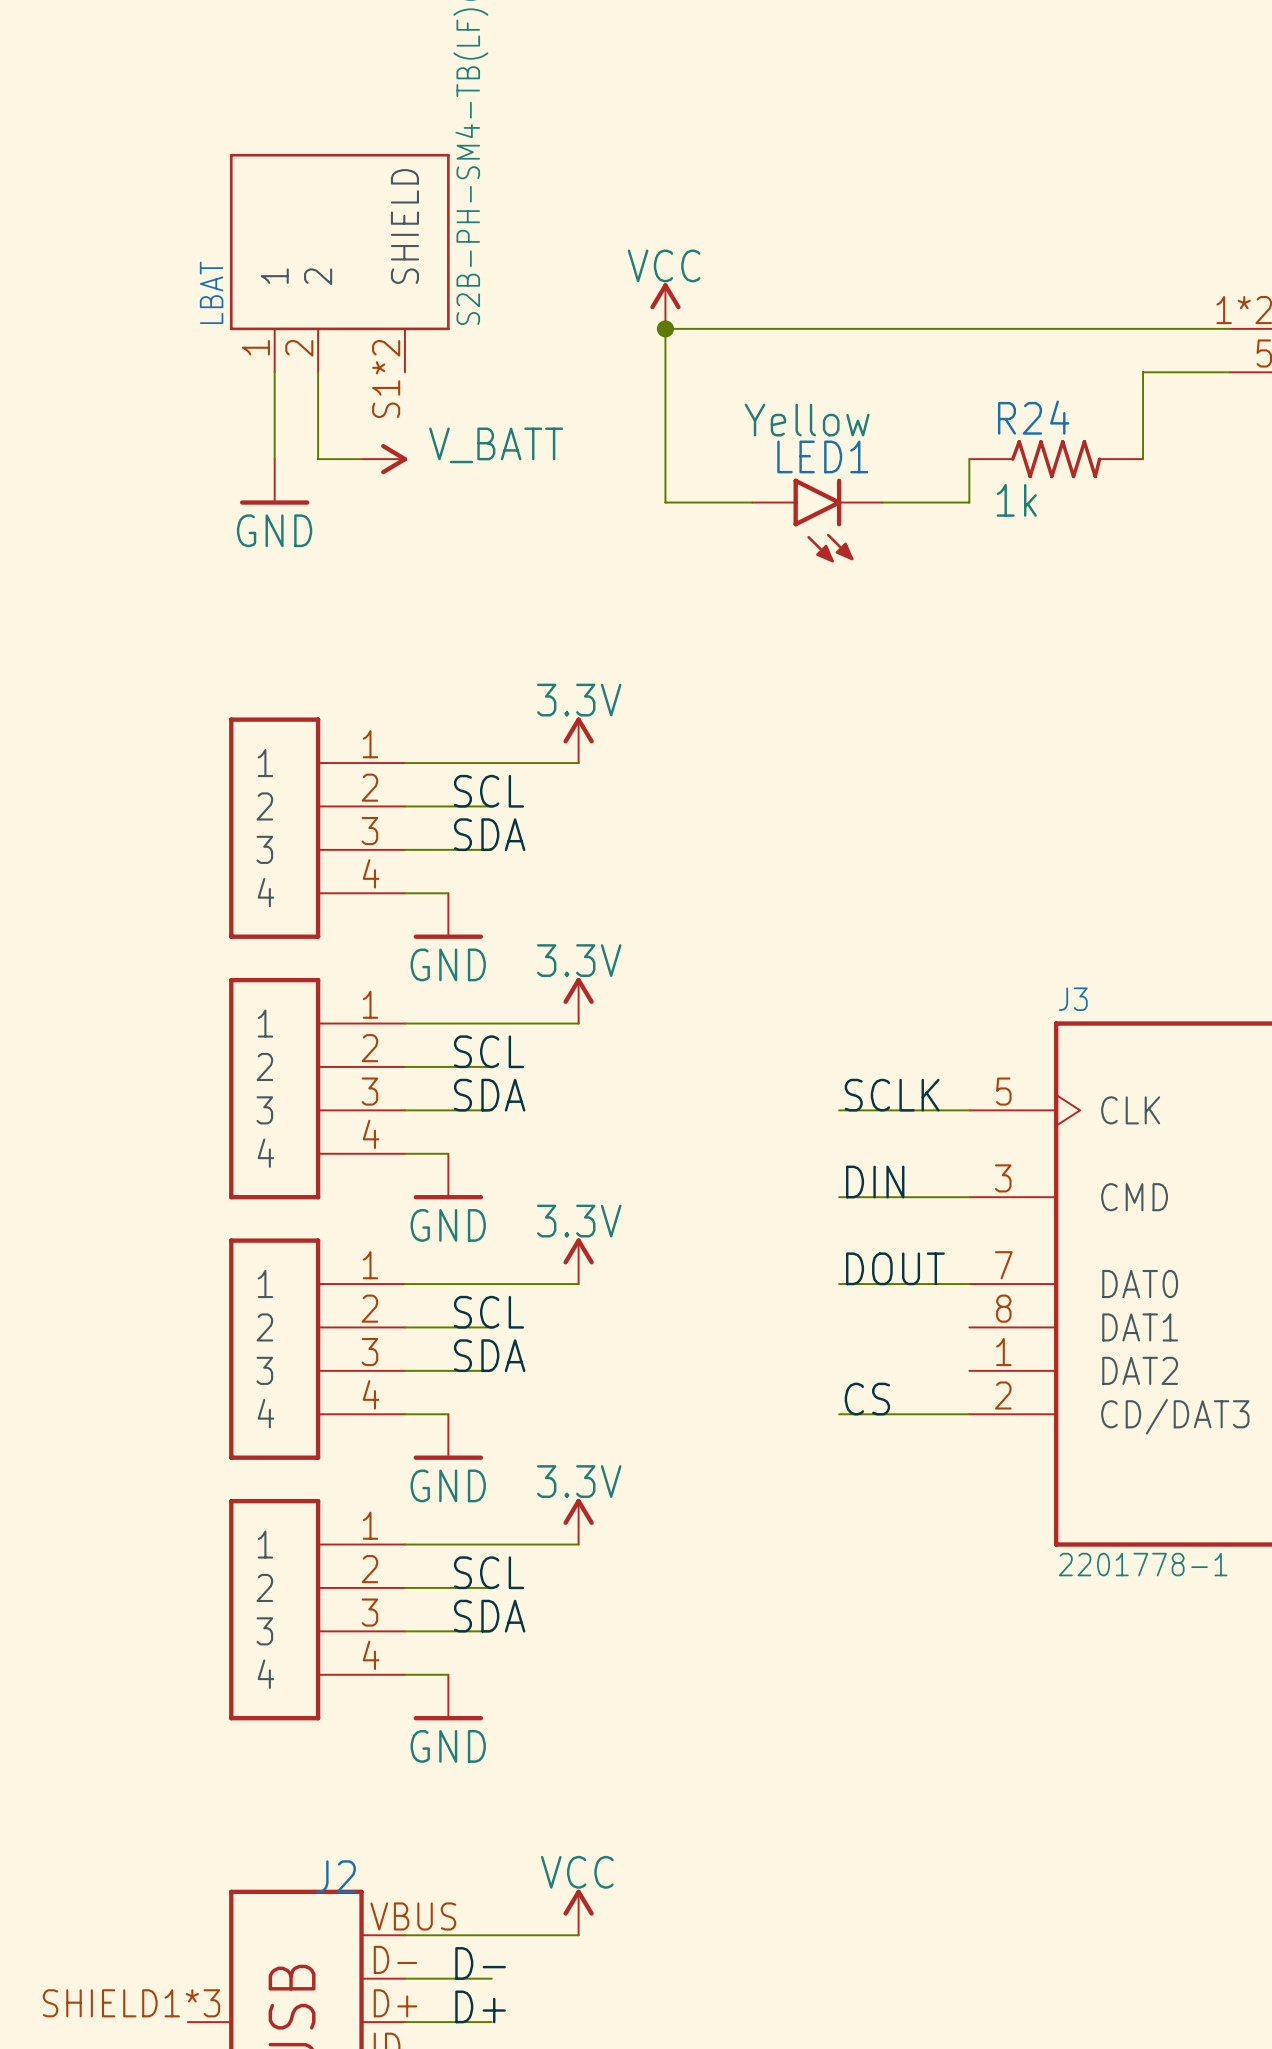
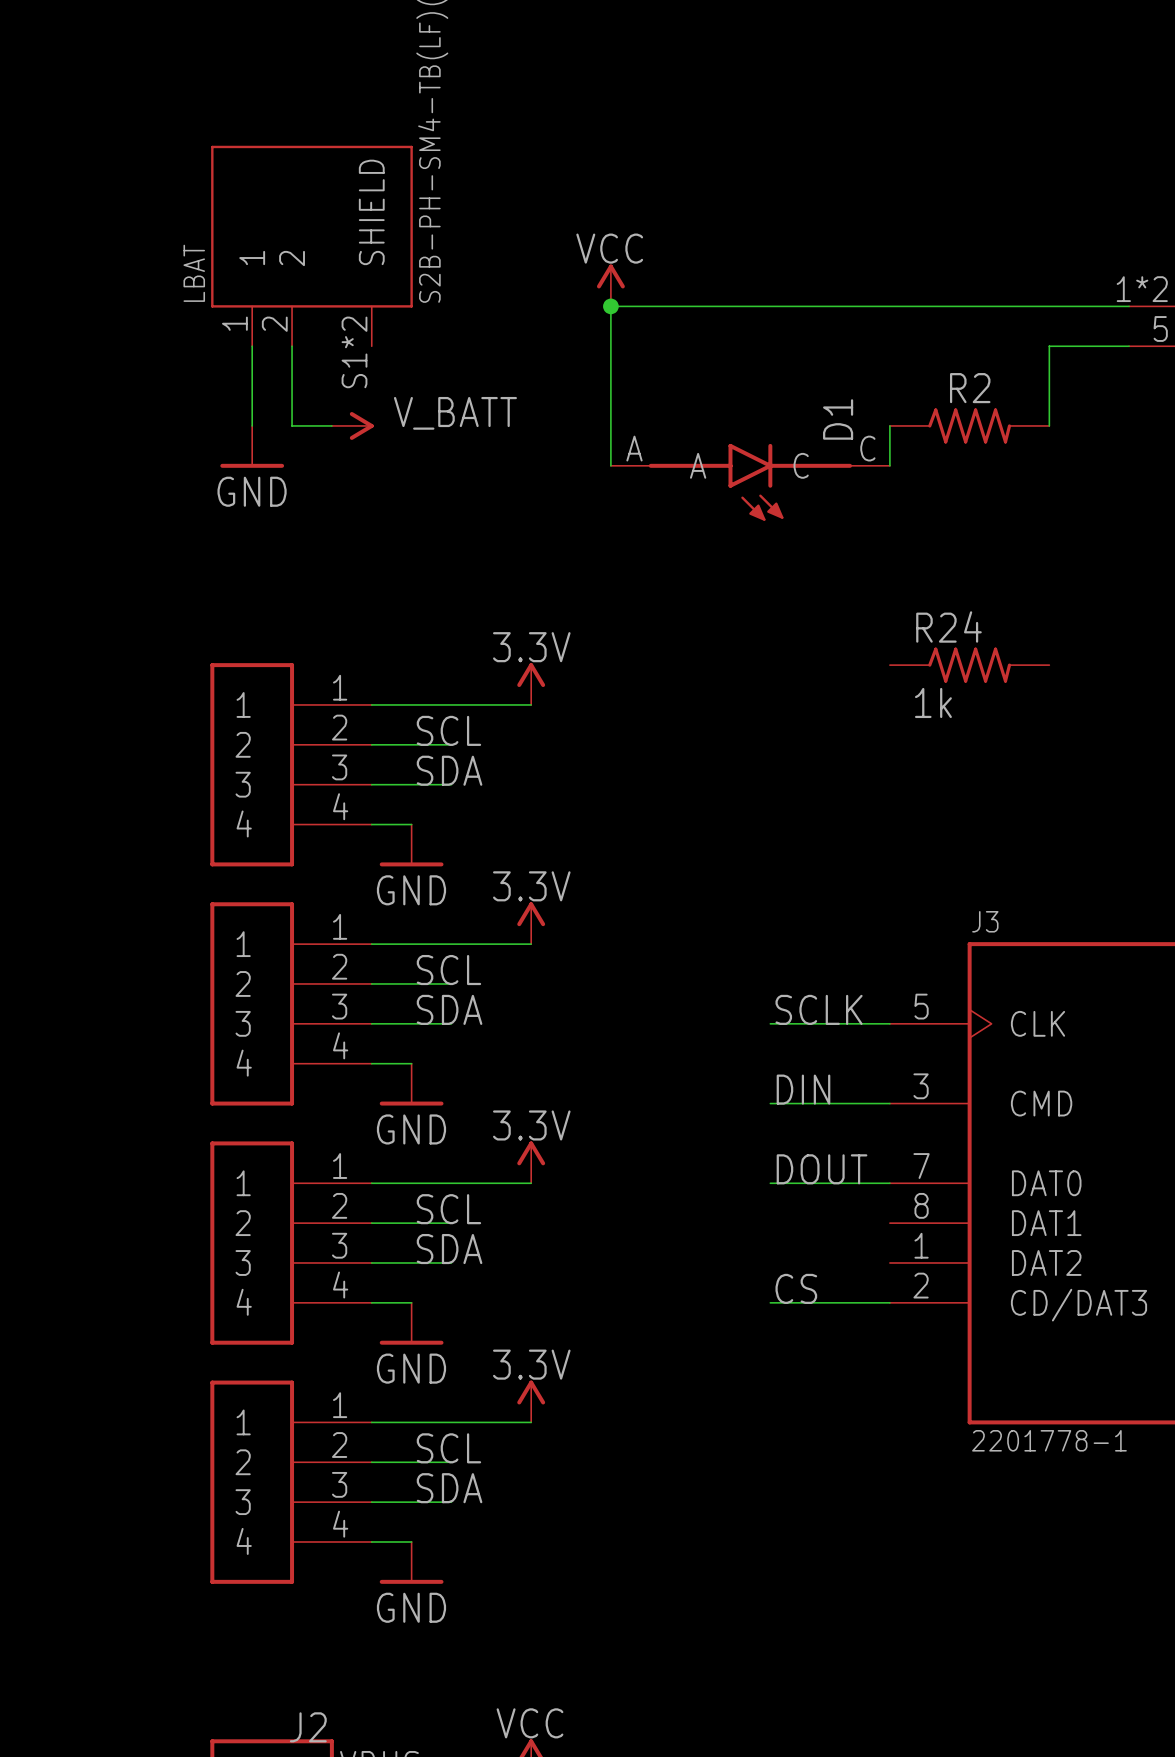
R24 name: R24 (1033, 417) -> R2 (970, 388)
R24 value: 1k (1016, 500) -> none
LED1: Yellow (817, 520) -> none
D1: none -> (750, 482)
R24: none -> 1k (969, 665)

